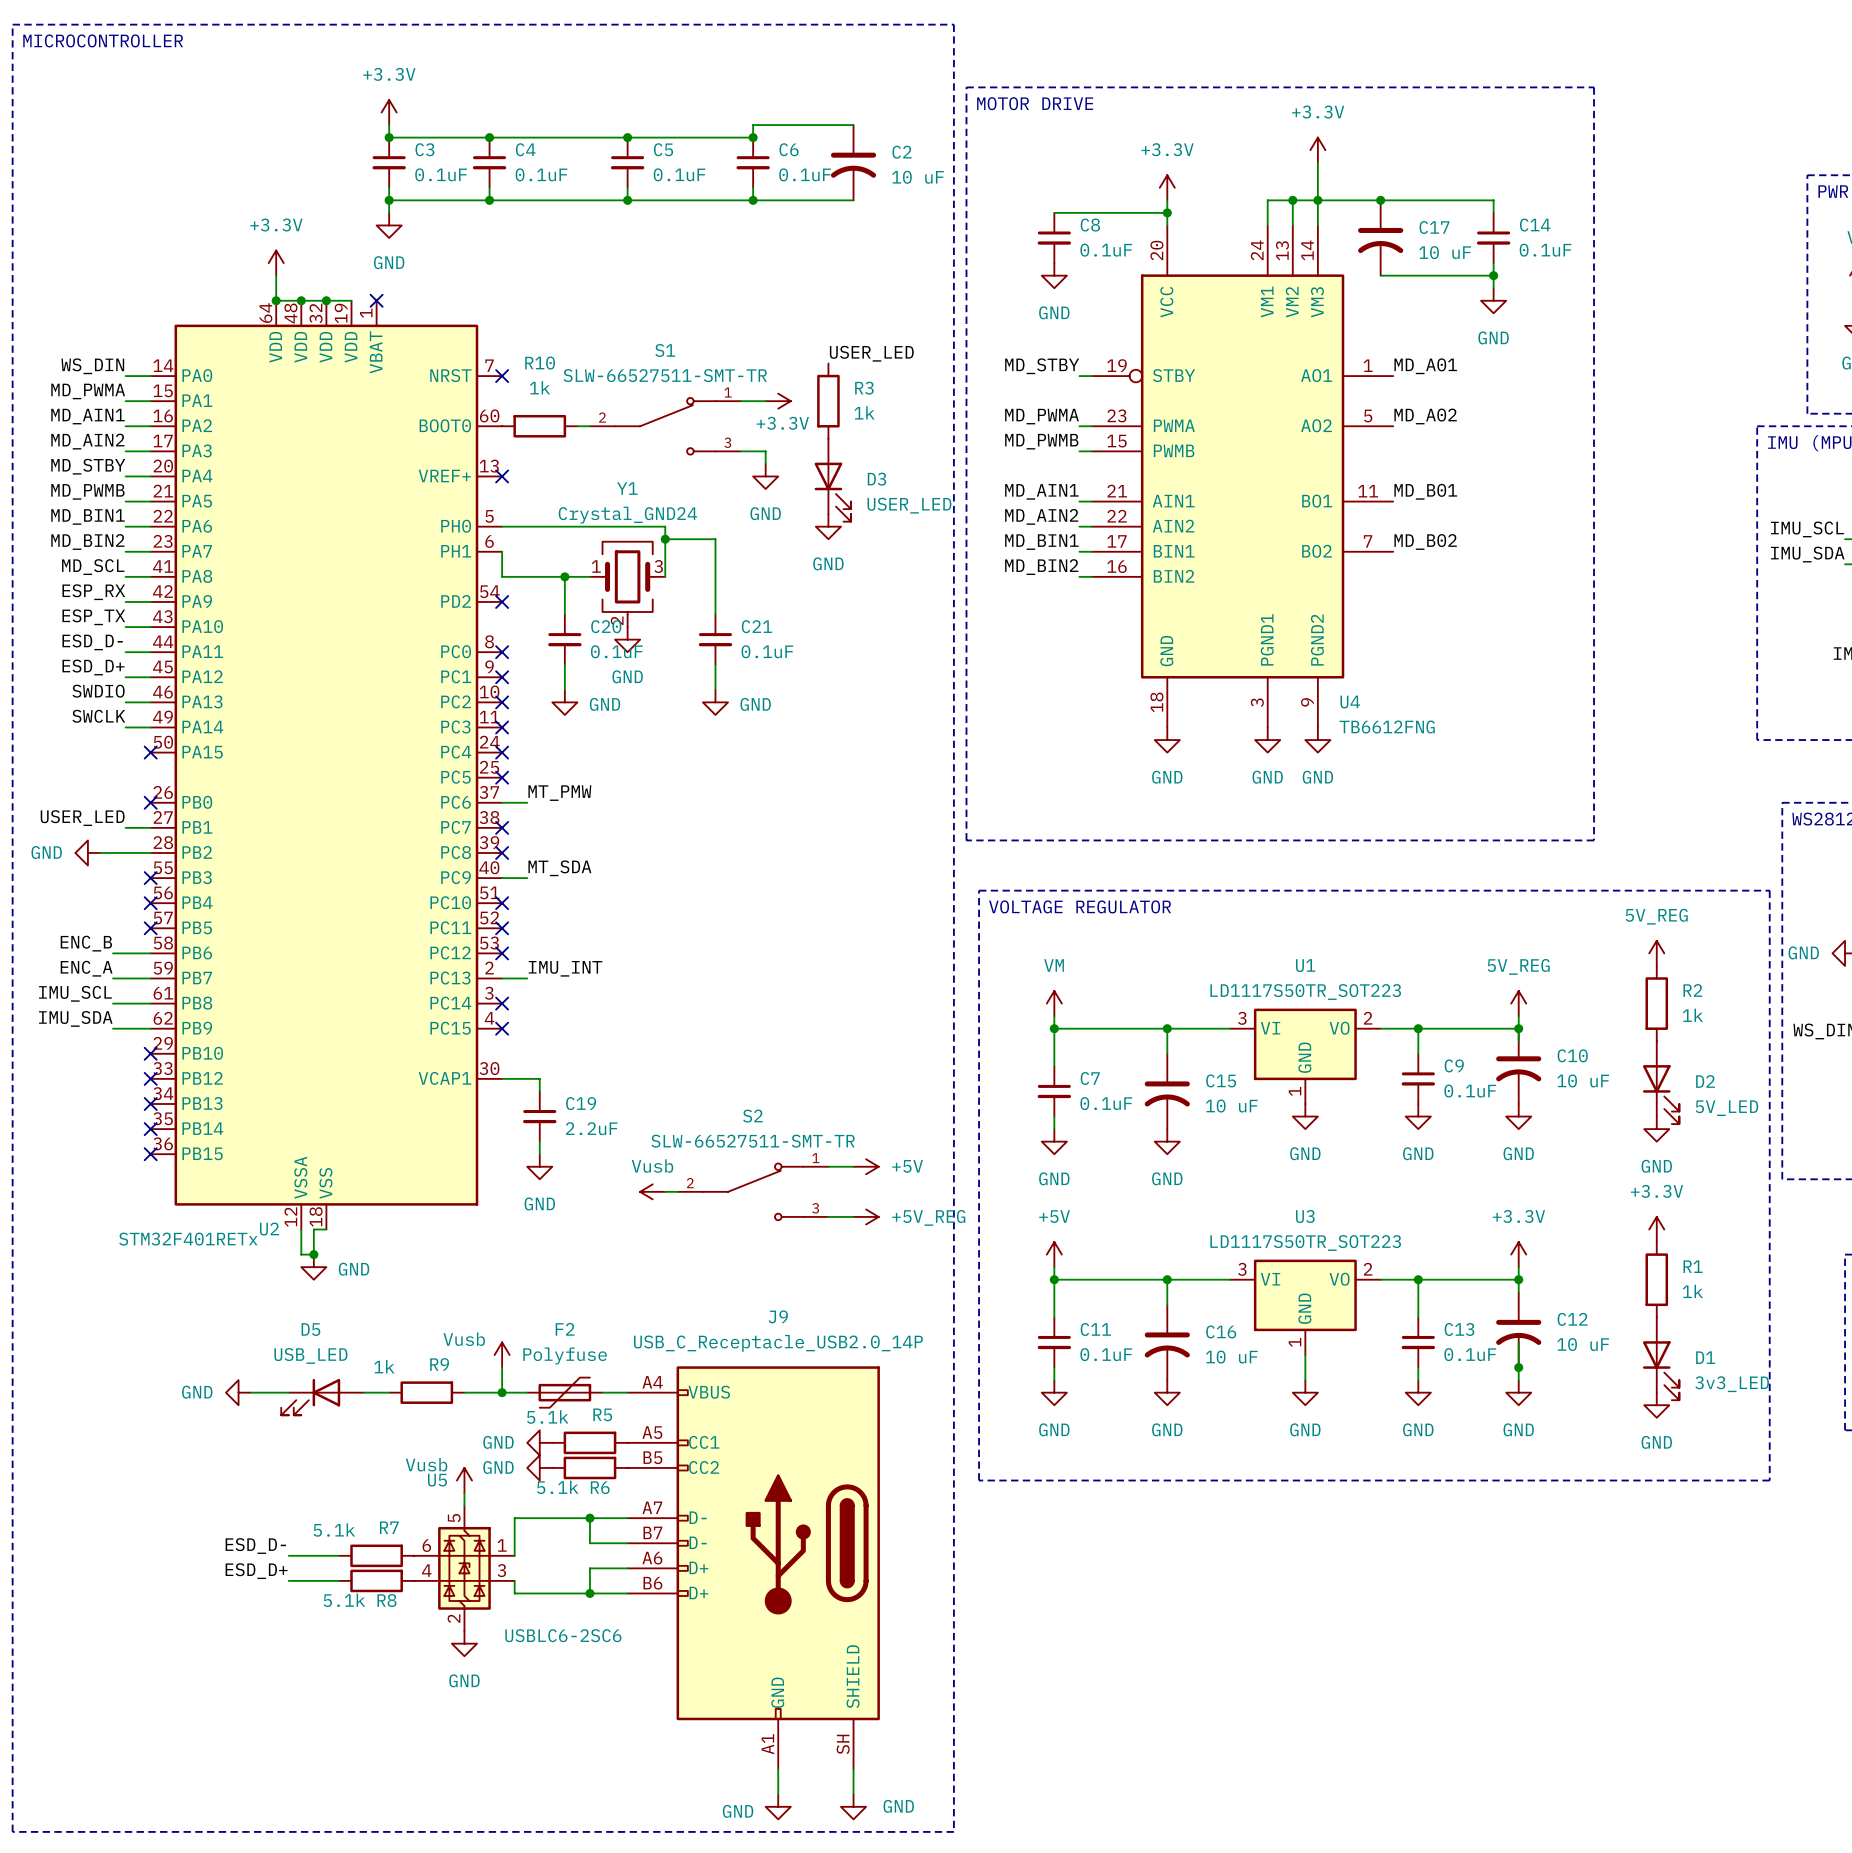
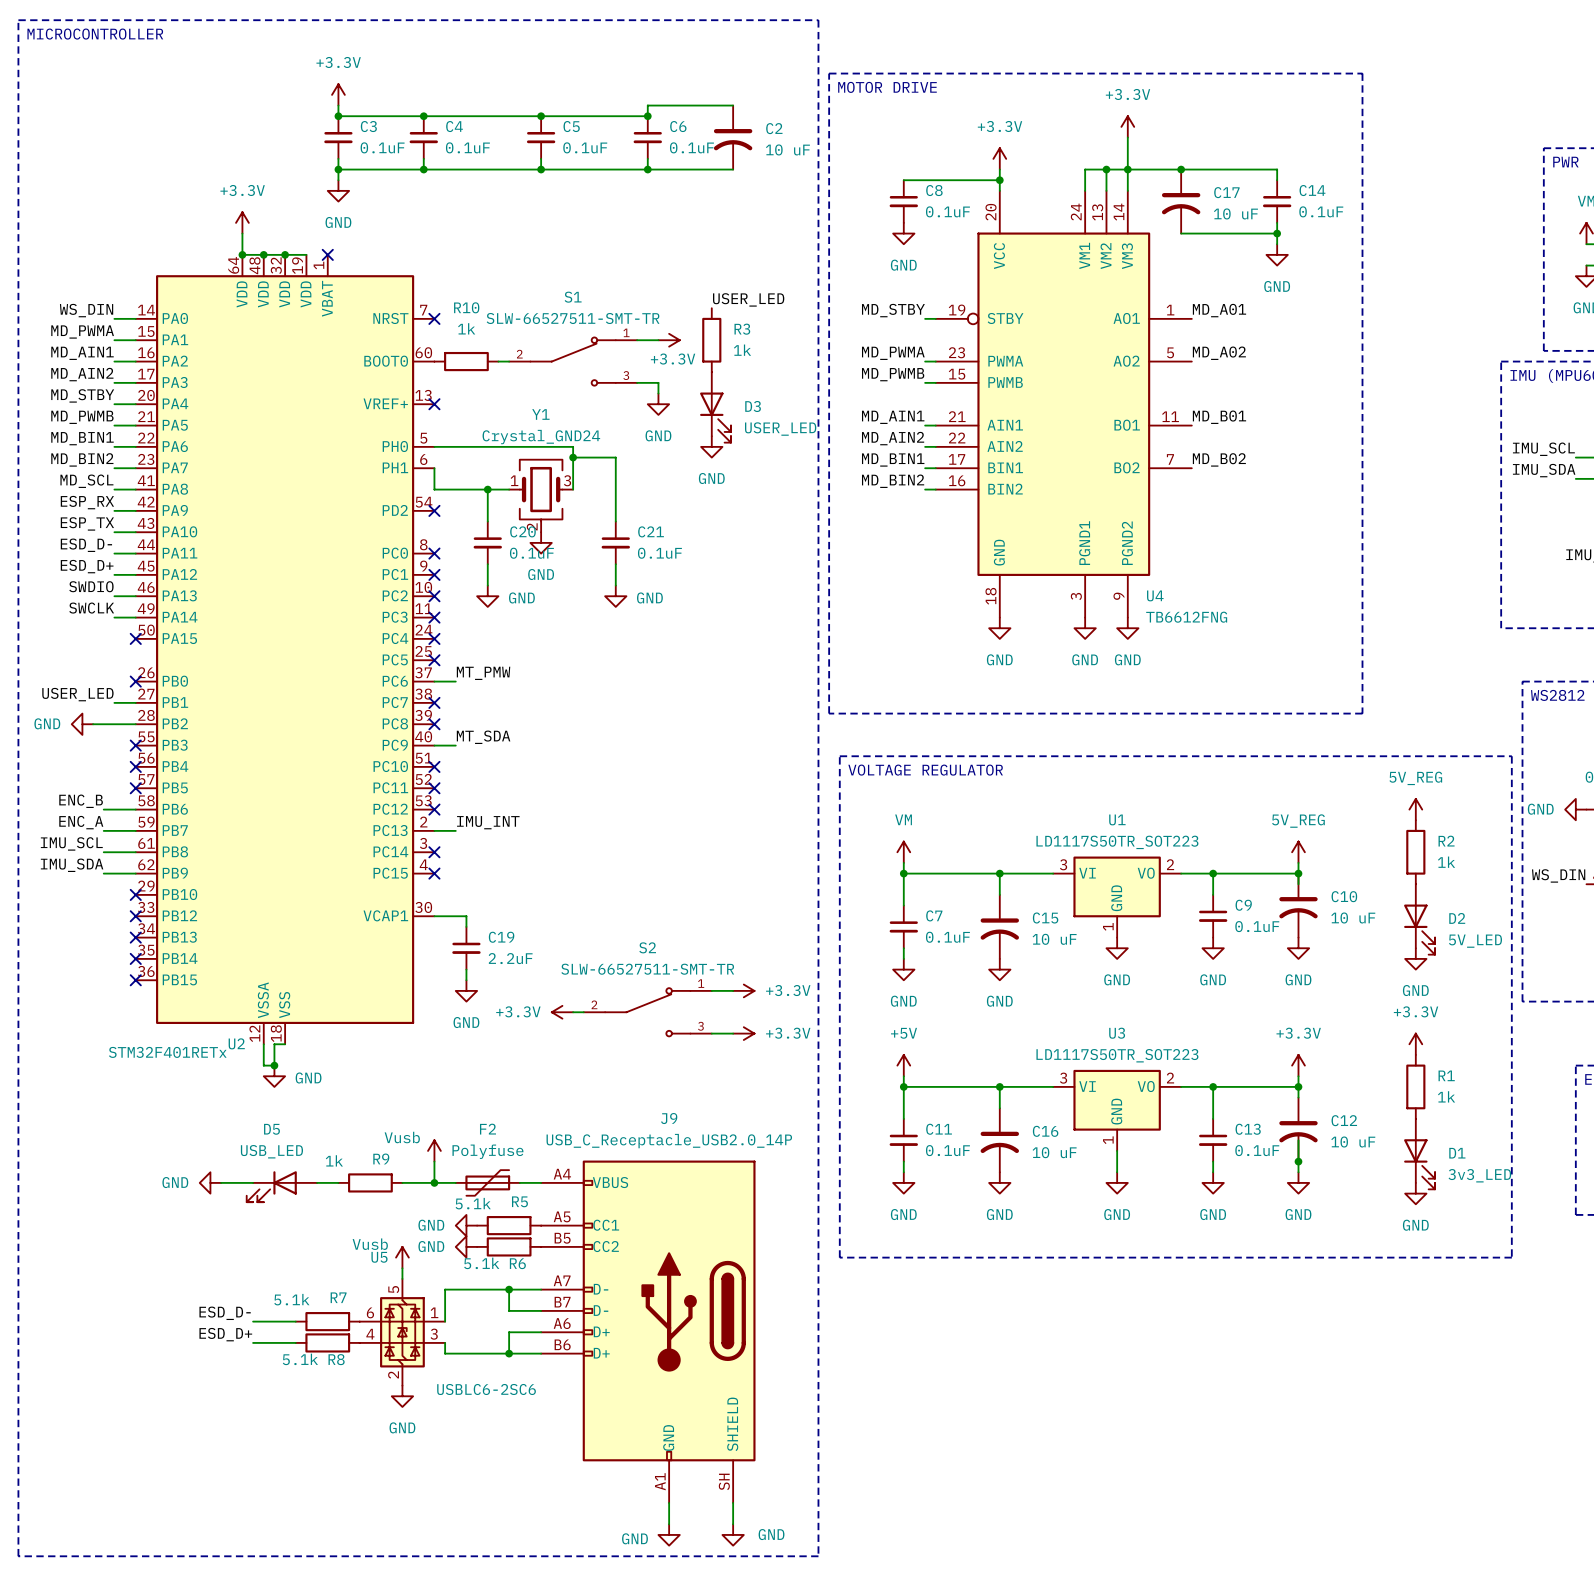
power symbol: +5V (866, 1166) -> +3.3V (743, 990)
power symbol: Vusb (652, 1191) -> +3.3V (562, 1012)
power symbol: +5V_REG (866, 1216) -> +3.3V (743, 1033)

